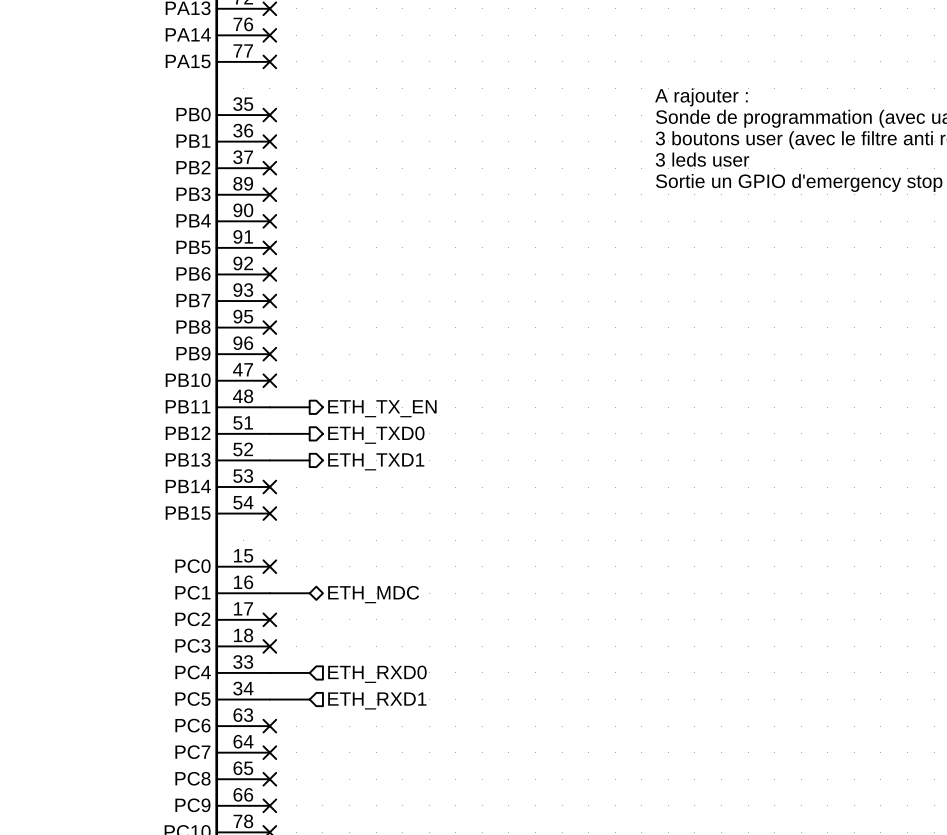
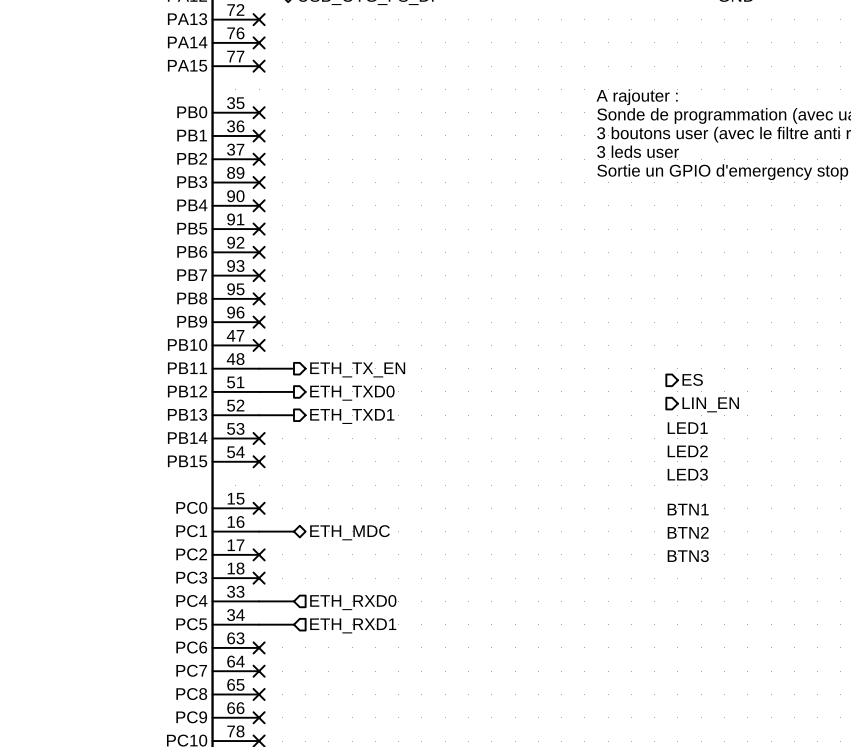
hierarchical label: none -> ES (692, 379)
hierarchical label: none -> LIN_EN (710, 404)
label: none -> LED1 (687, 428)
label: none -> LED2 (687, 451)
label: none -> LED3 (687, 474)
label: none -> BTN1 (688, 509)
label: none -> BTN2 (688, 532)
label: none -> BTN3 (688, 556)

